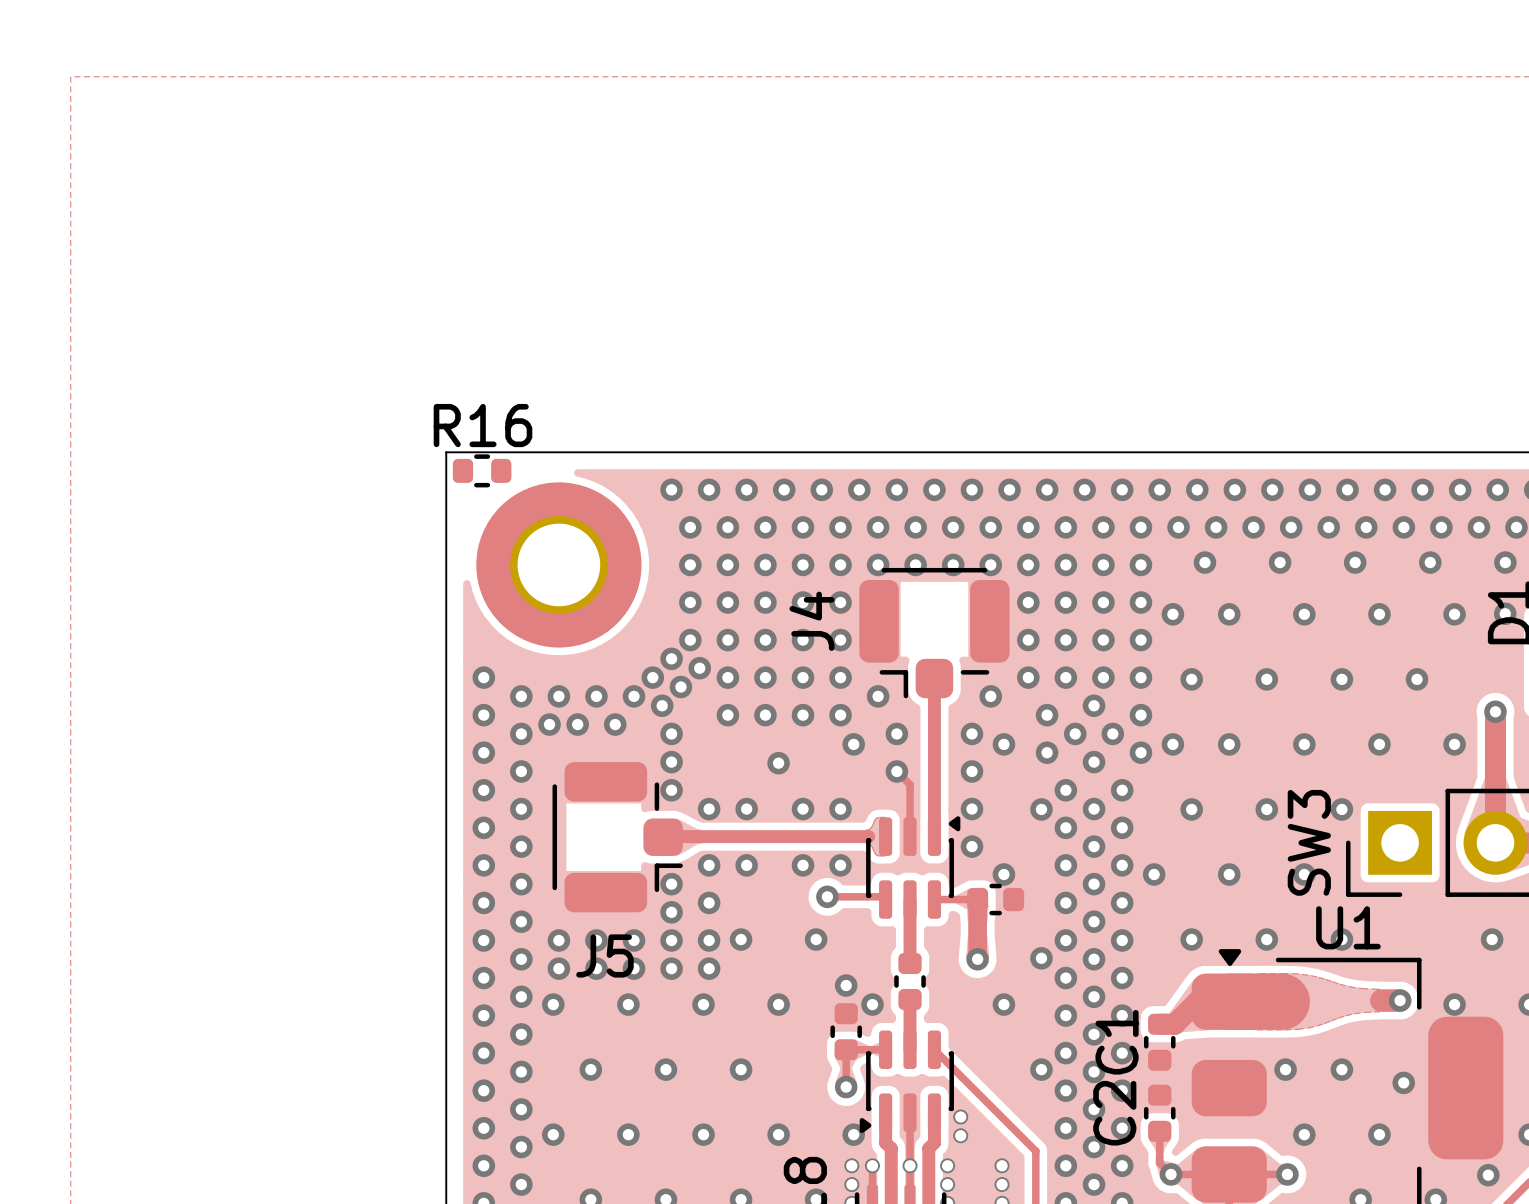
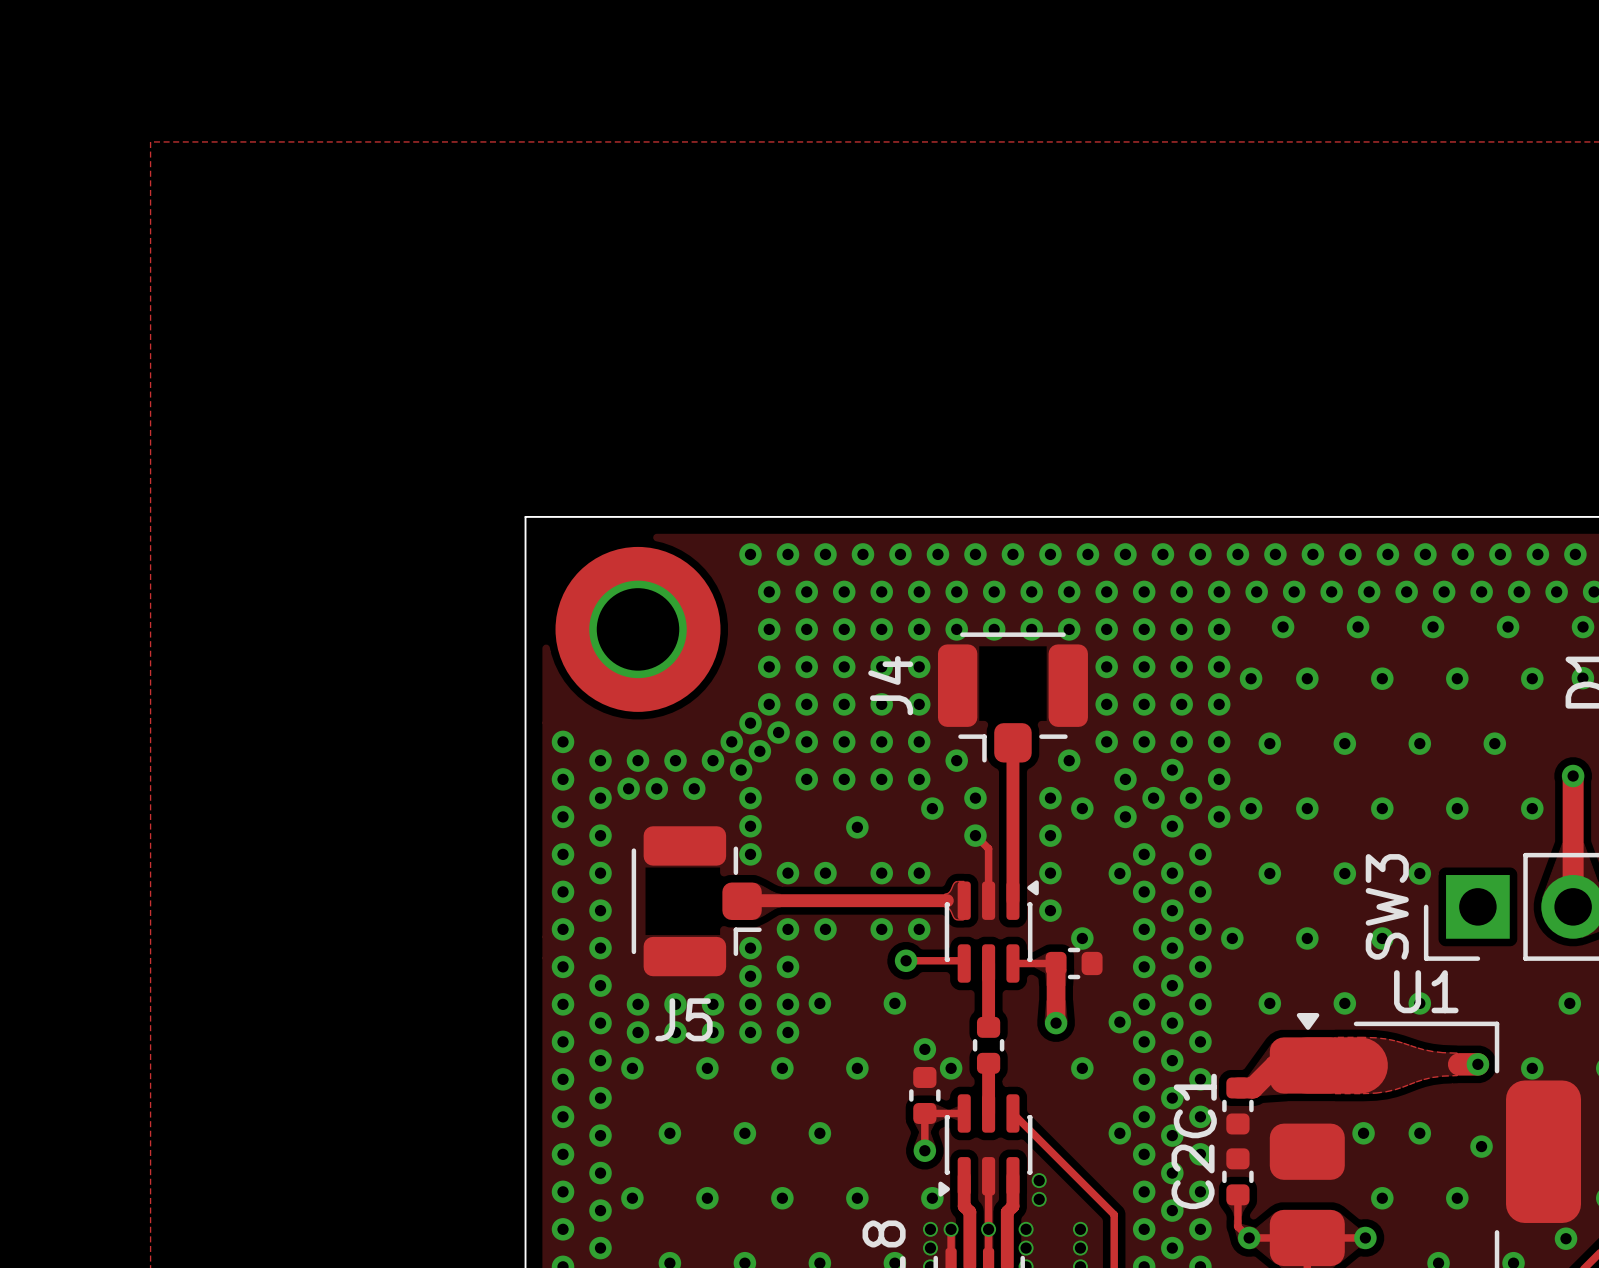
R16: (482, 470) -> none

